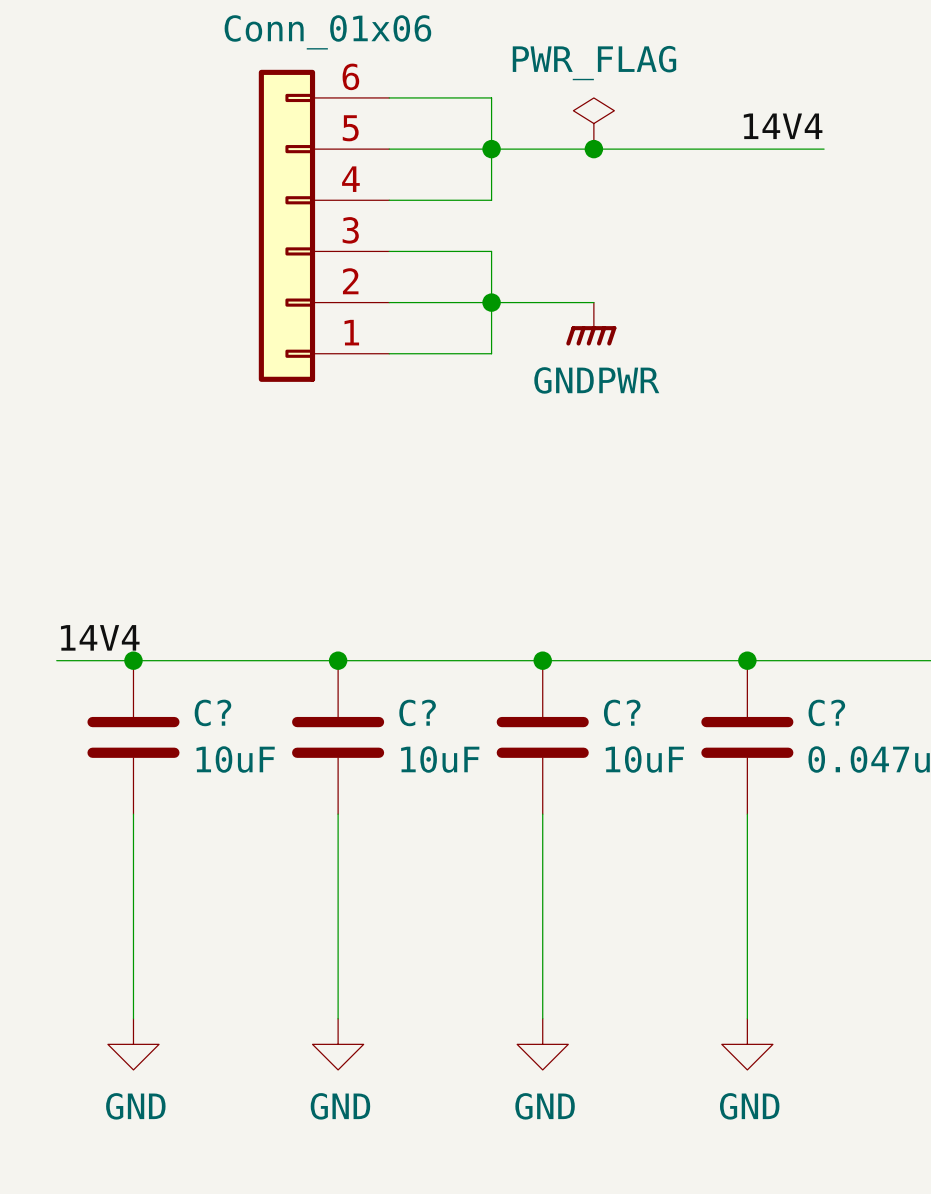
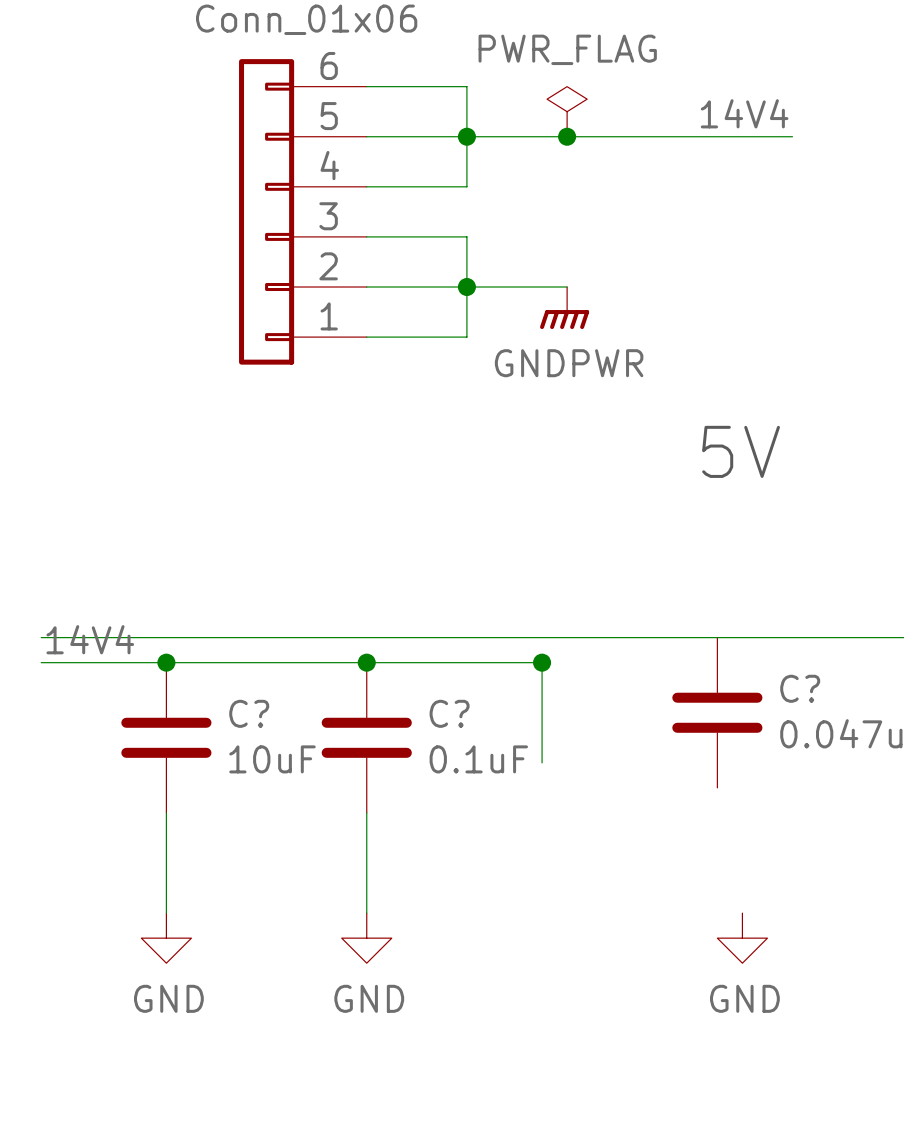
text: none -> 5V (741, 451)
label position: 14V4 (100, 637) -> 14V4 (90, 639)
junction position: (133, 660) -> (166, 662)
junction position: (338, 660) -> (366, 662)
junction position: (542, 660) -> (542, 662)
junction: (747, 660) -> none
wire: none -> (41, 662) (542, 662) (542, 762)
C? position: (133, 737) -> (166, 737)
C?: 10uF (338, 737) -> none
C?: 10uF (542, 737) -> none
C?: none -> 0.1uF (366, 737)
wire: (133, 814) (133, 1018) -> none
wire: (338, 814) (338, 1018) -> none
wire: (542, 814) (542, 1018) -> none
wire: (747, 814) (747, 1018) -> none
wire: none -> (166, 812) (166, 913)
wire: none -> (366, 812) (366, 913)
power symbol: none -> GND (166, 938)
power symbol: none -> GND (366, 938)
power symbol: GND (133, 1044) -> none
power symbol: GND (338, 1044) -> none
power symbol: GND (542, 1044) -> none
power symbol position: GND (747, 1044) -> GND (742, 938)

